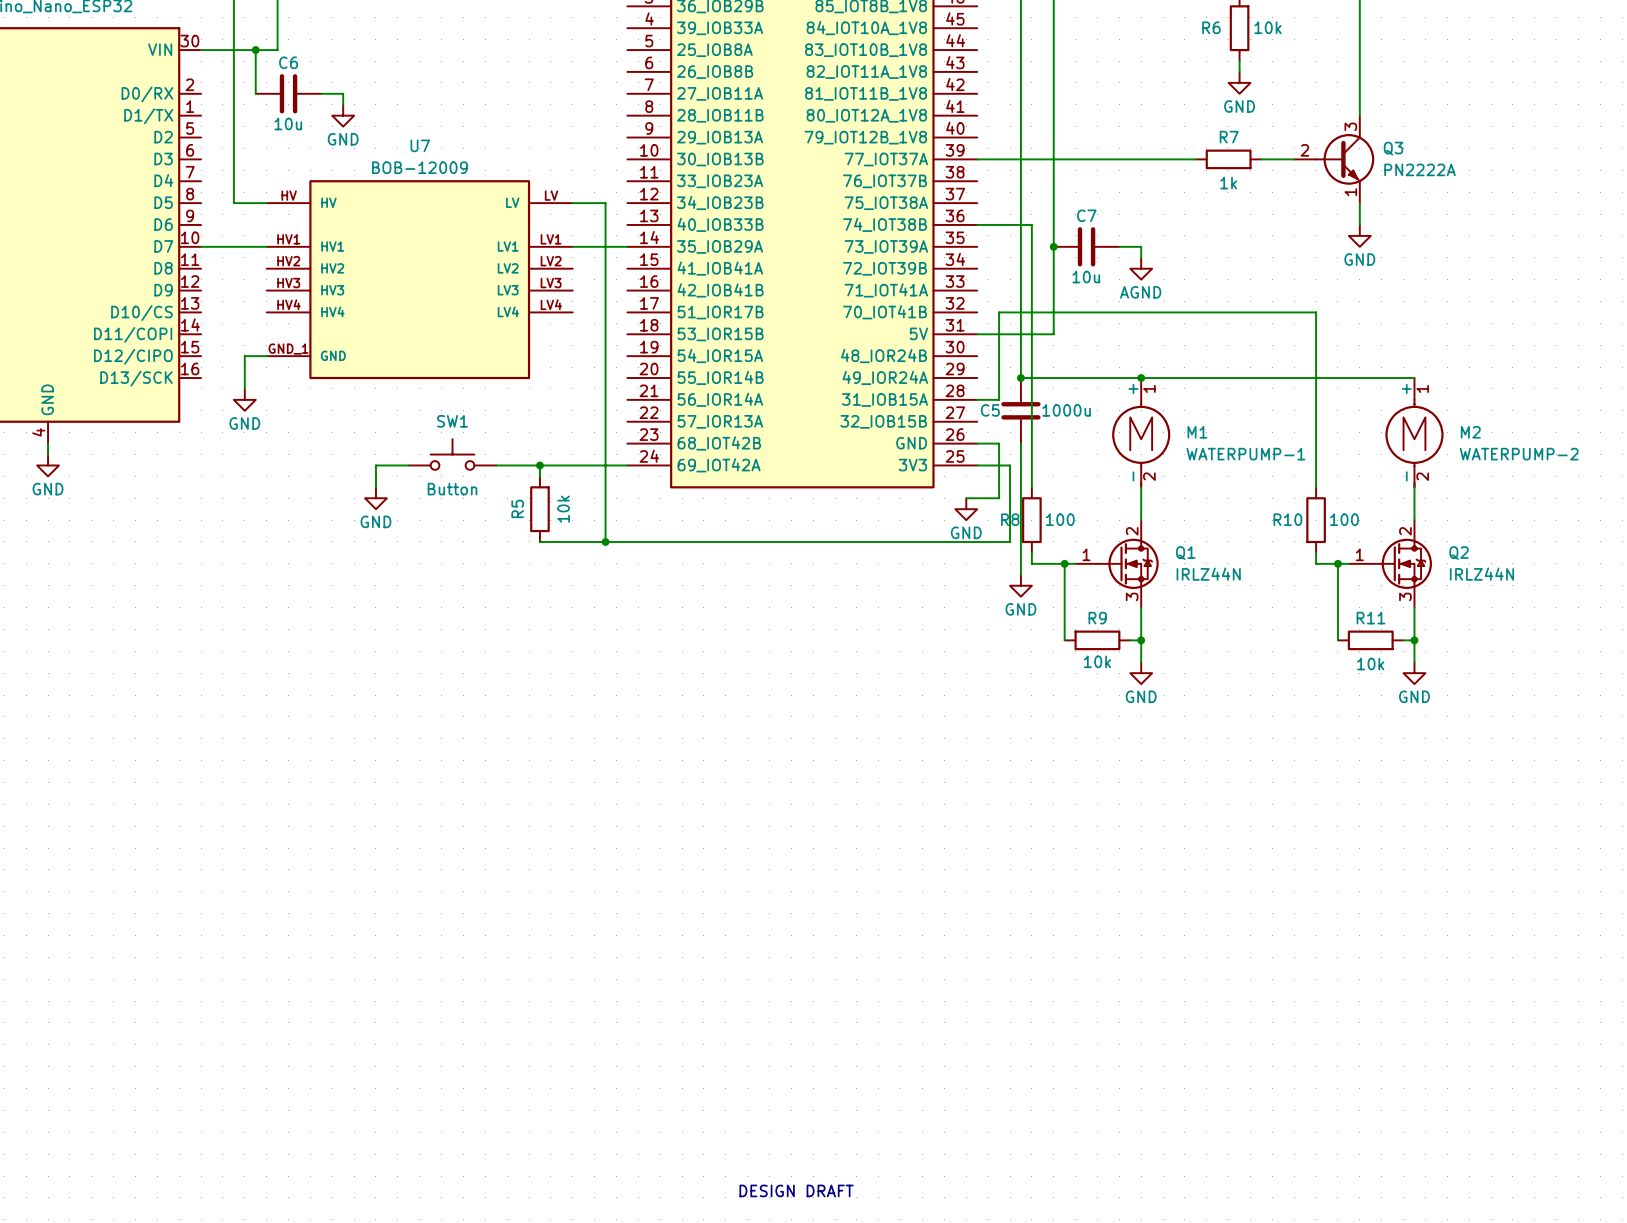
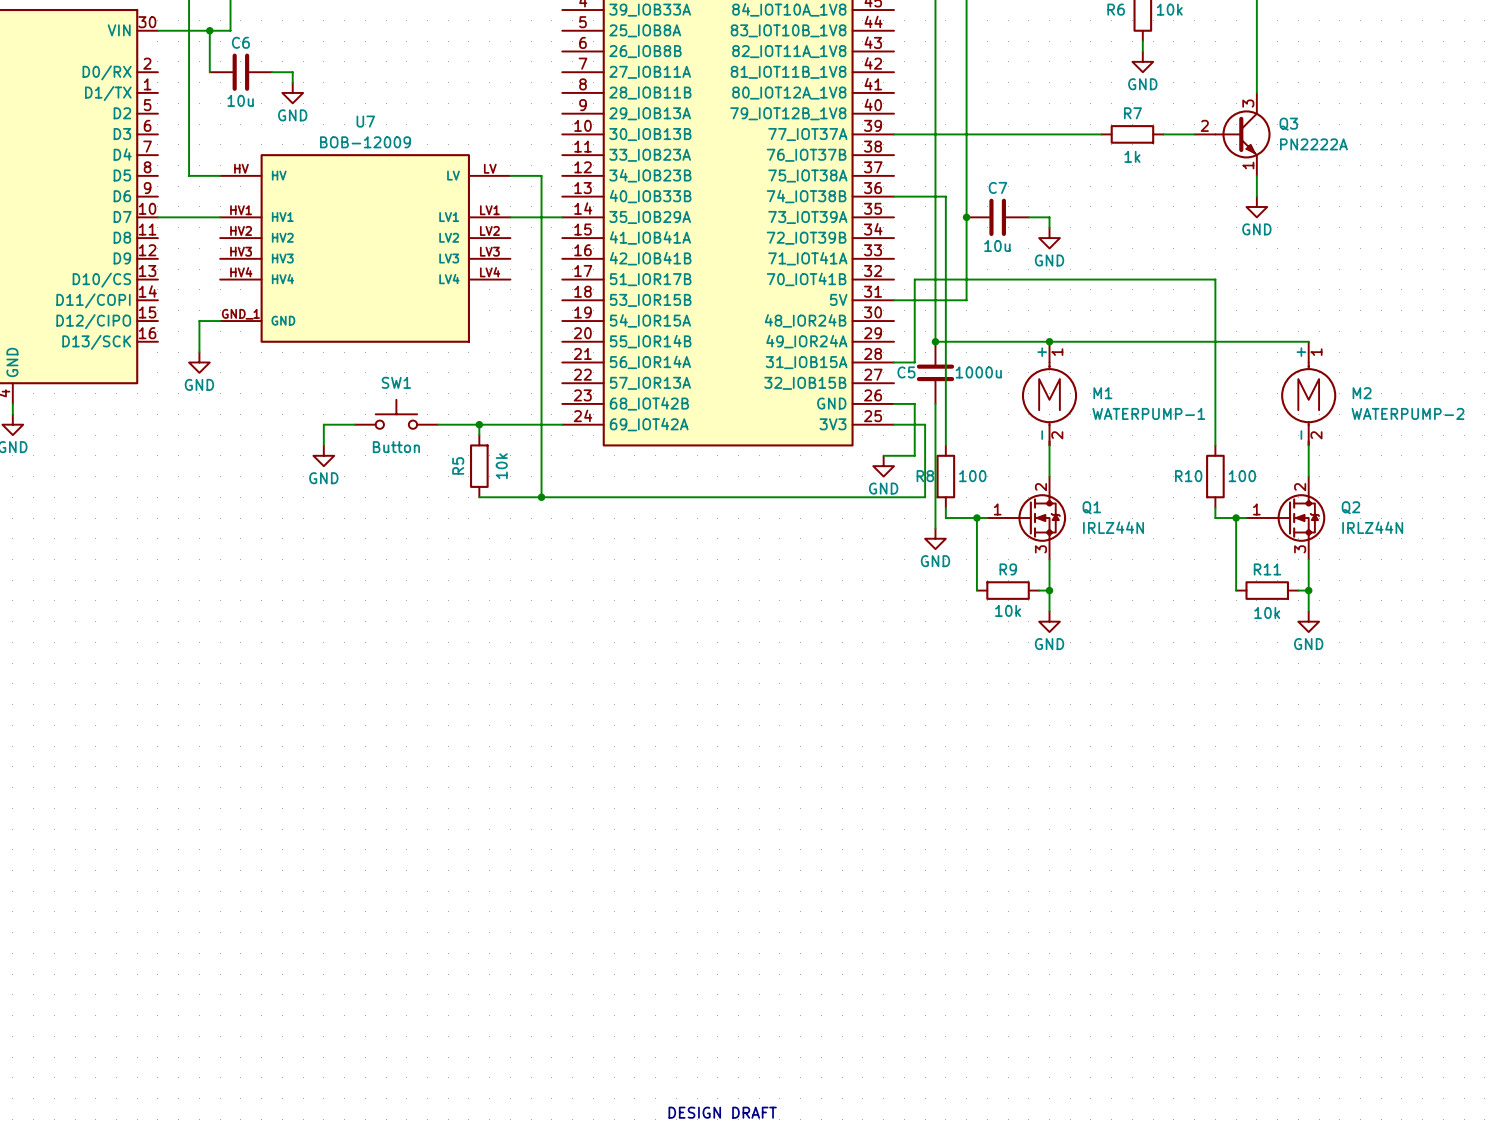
power symbol: AGND (1141, 268) -> GND (1049, 238)

